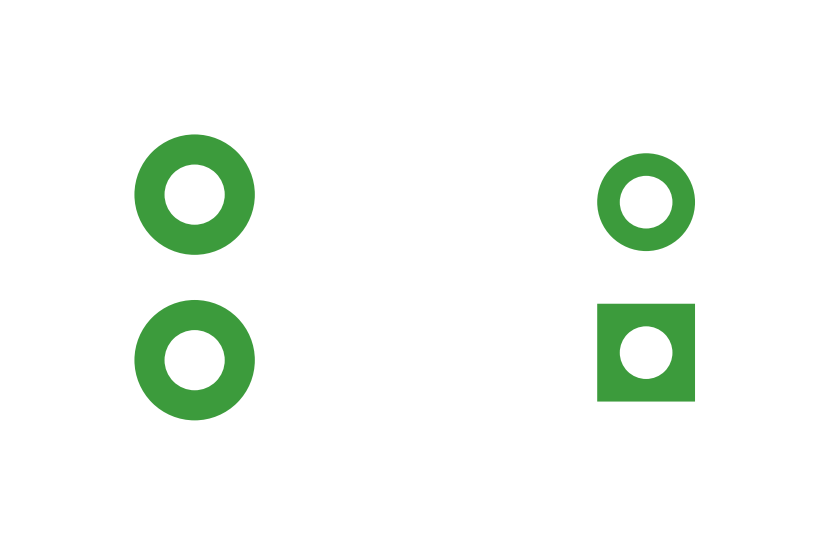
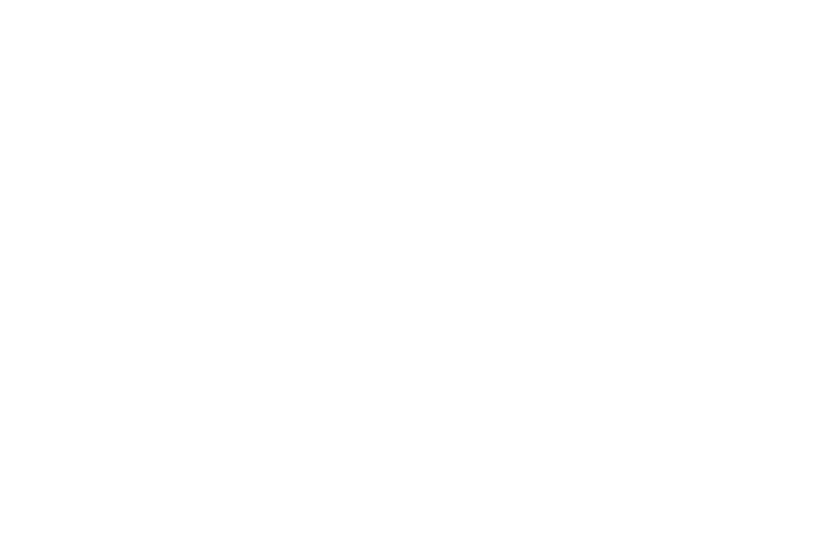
part: (194, 277) -> none
part: (646, 277) -> none

